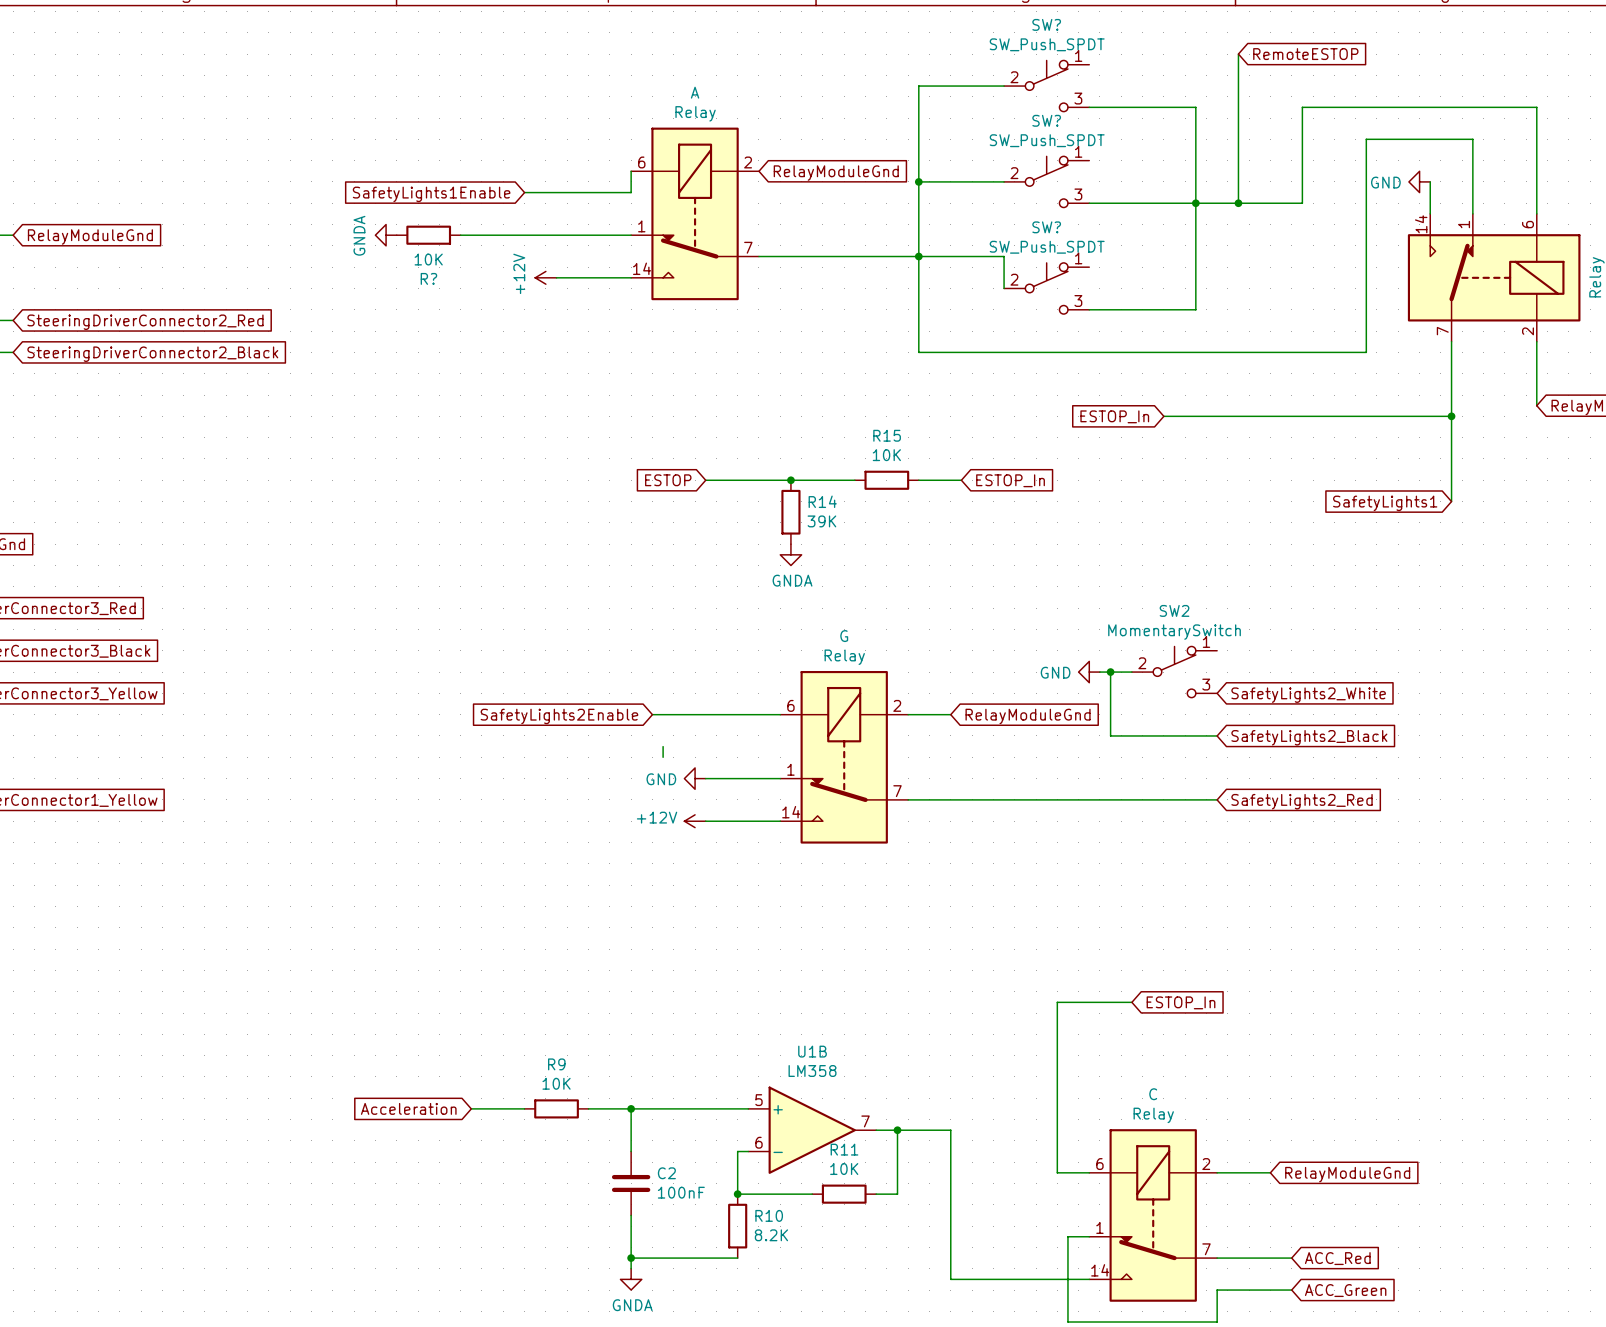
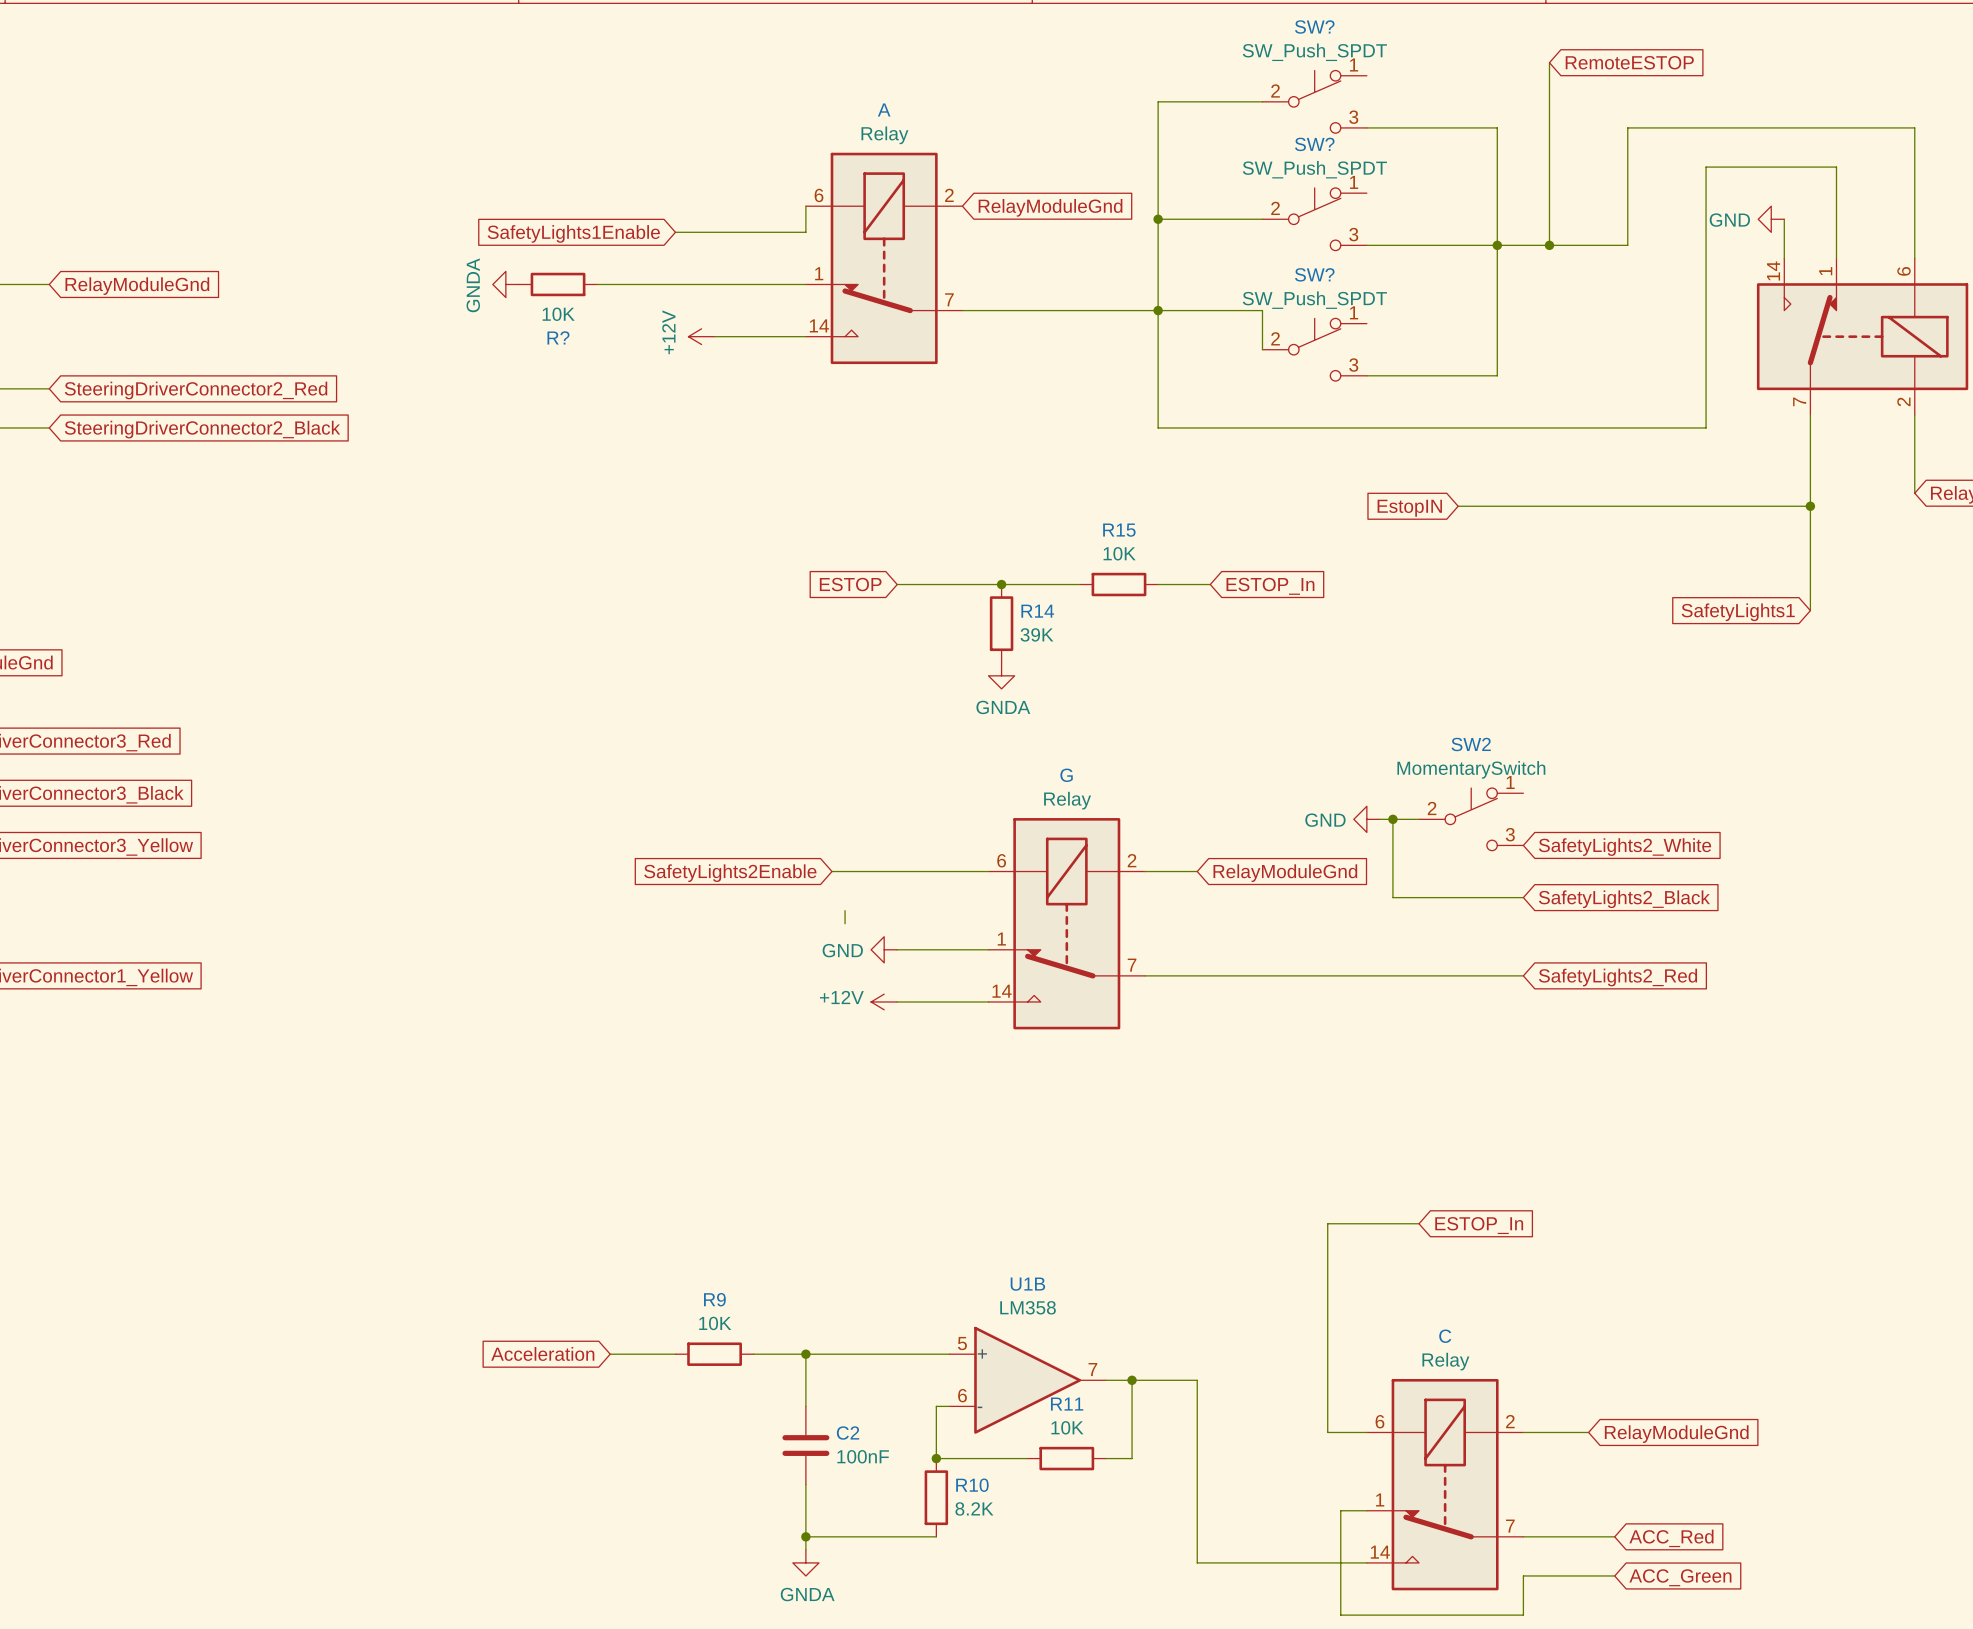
global label: ESTOP_In (1114, 416) -> EstopIN (1409, 508)

